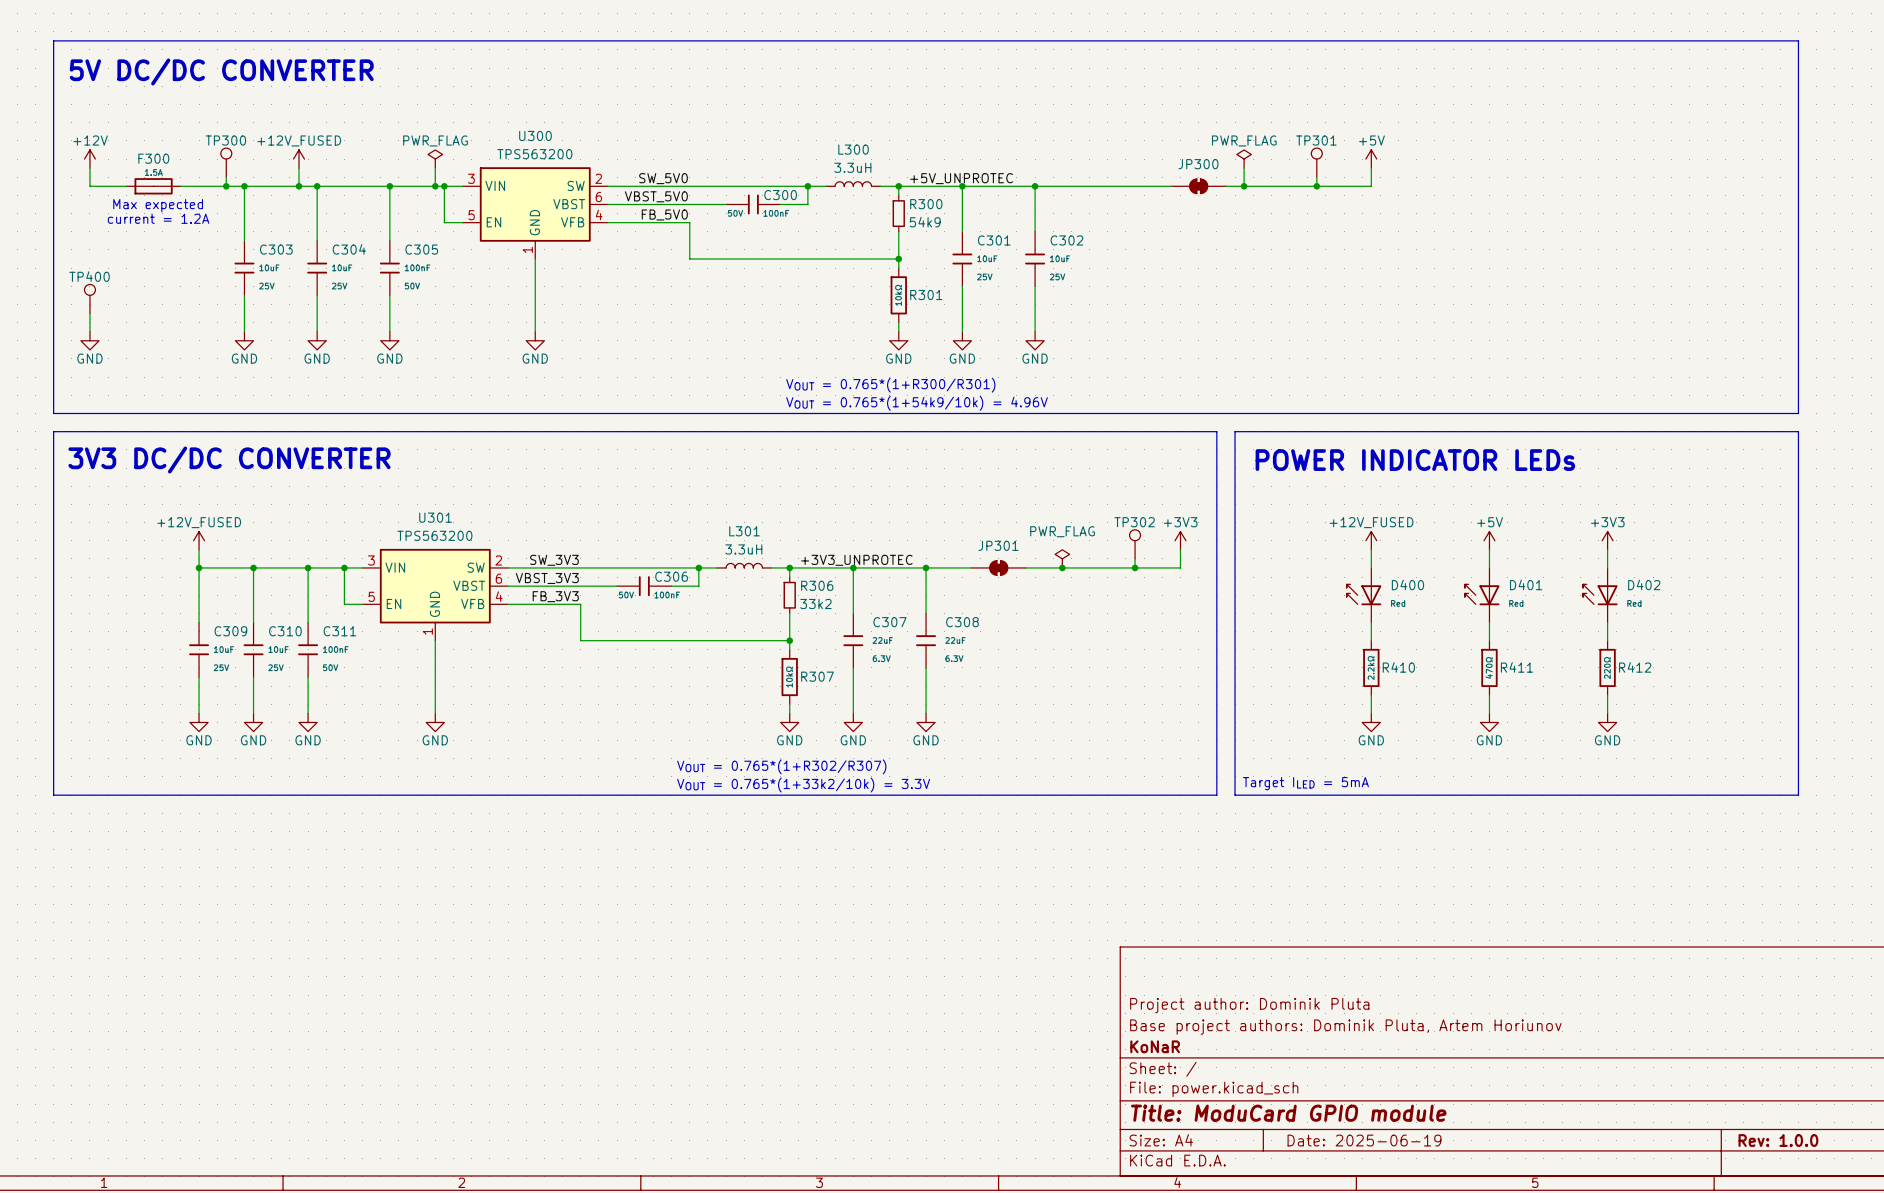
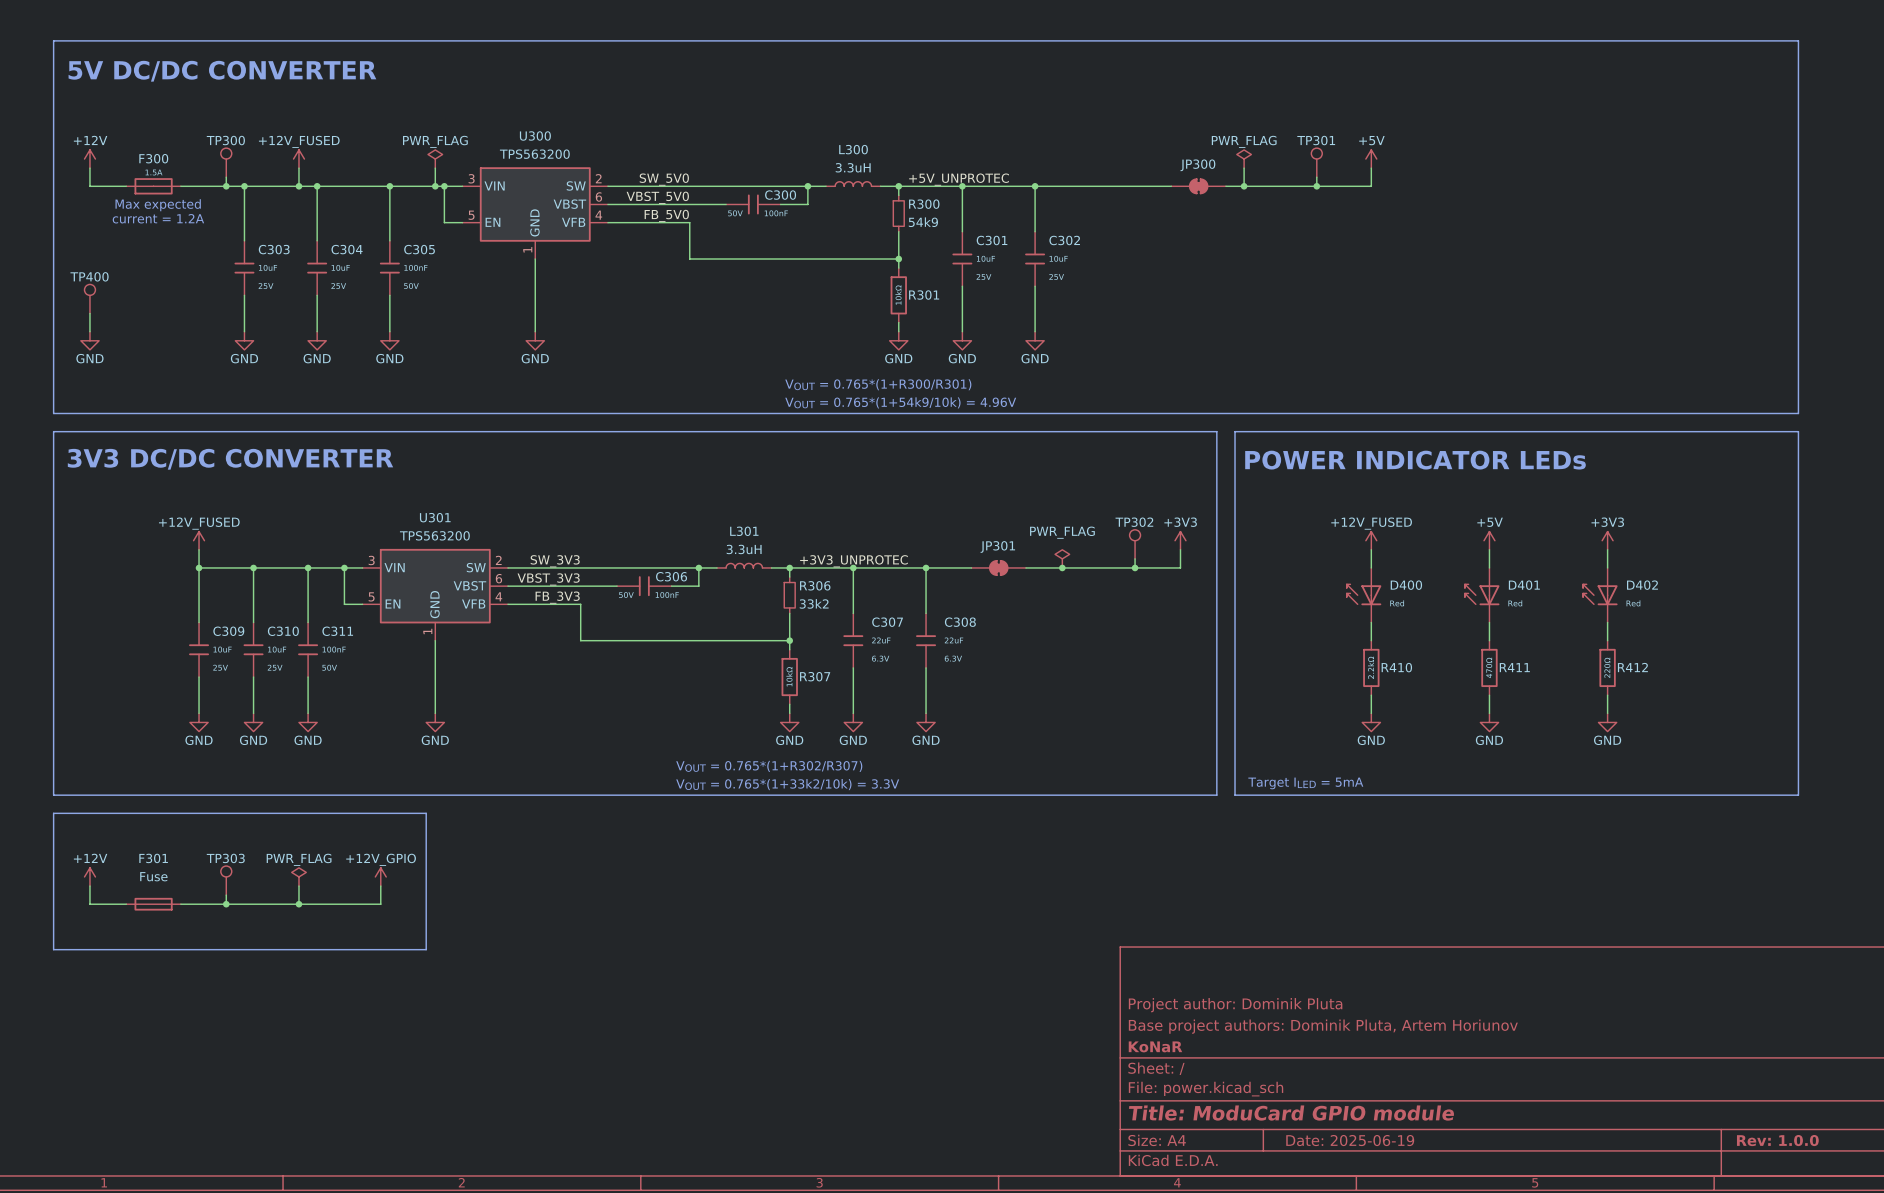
line: none -> (53, 813) (426, 813) (426, 949) (53, 949) (53, 813)
power symbol: none -> +12V (89, 876)
power symbol: none -> PWR_FLAG (298, 876)
power symbol: none -> +12V_GPIO (380, 876)
TP303: none -> (226, 880)
wire: none -> (89, 886) (89, 904) (126, 904)
wire: none -> (298, 886) (298, 904)
wire: none -> (380, 886) (380, 904) (180, 904)
wire: none -> (226, 895) (226, 904)
F301: none -> Fuse (153, 904)
junction: none -> (226, 904)
junction: none -> (298, 904)

